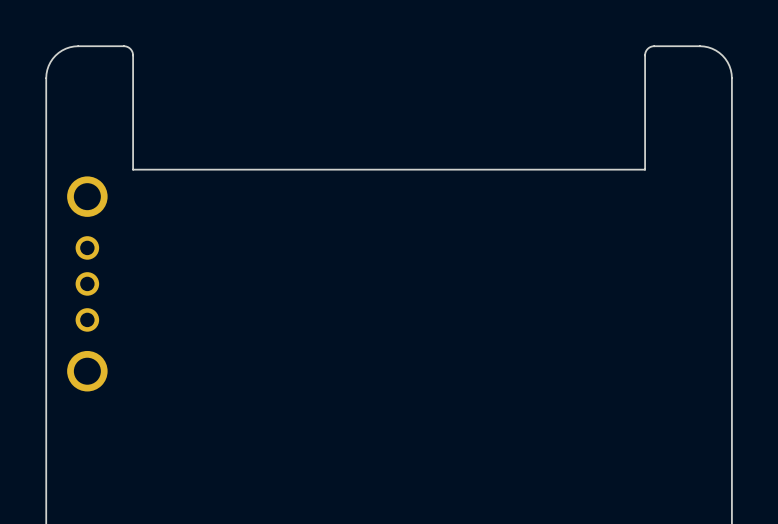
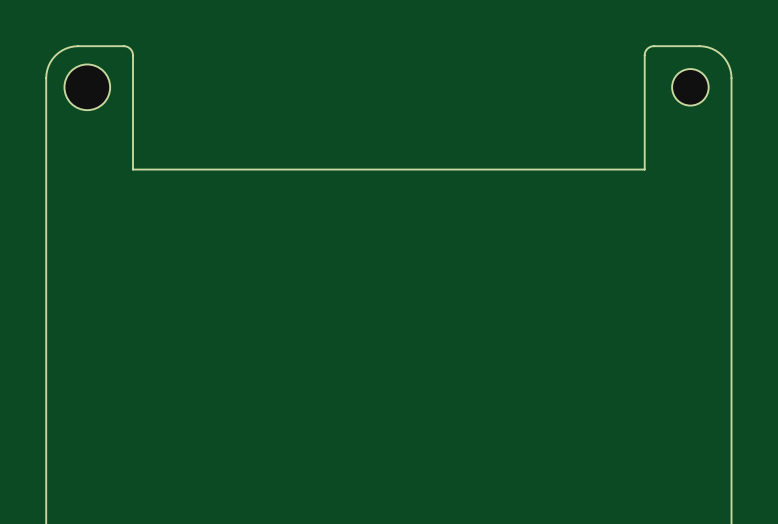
hole: none -> (87, 87)
hole: none -> (690, 87)
part: (87, 283) -> none

